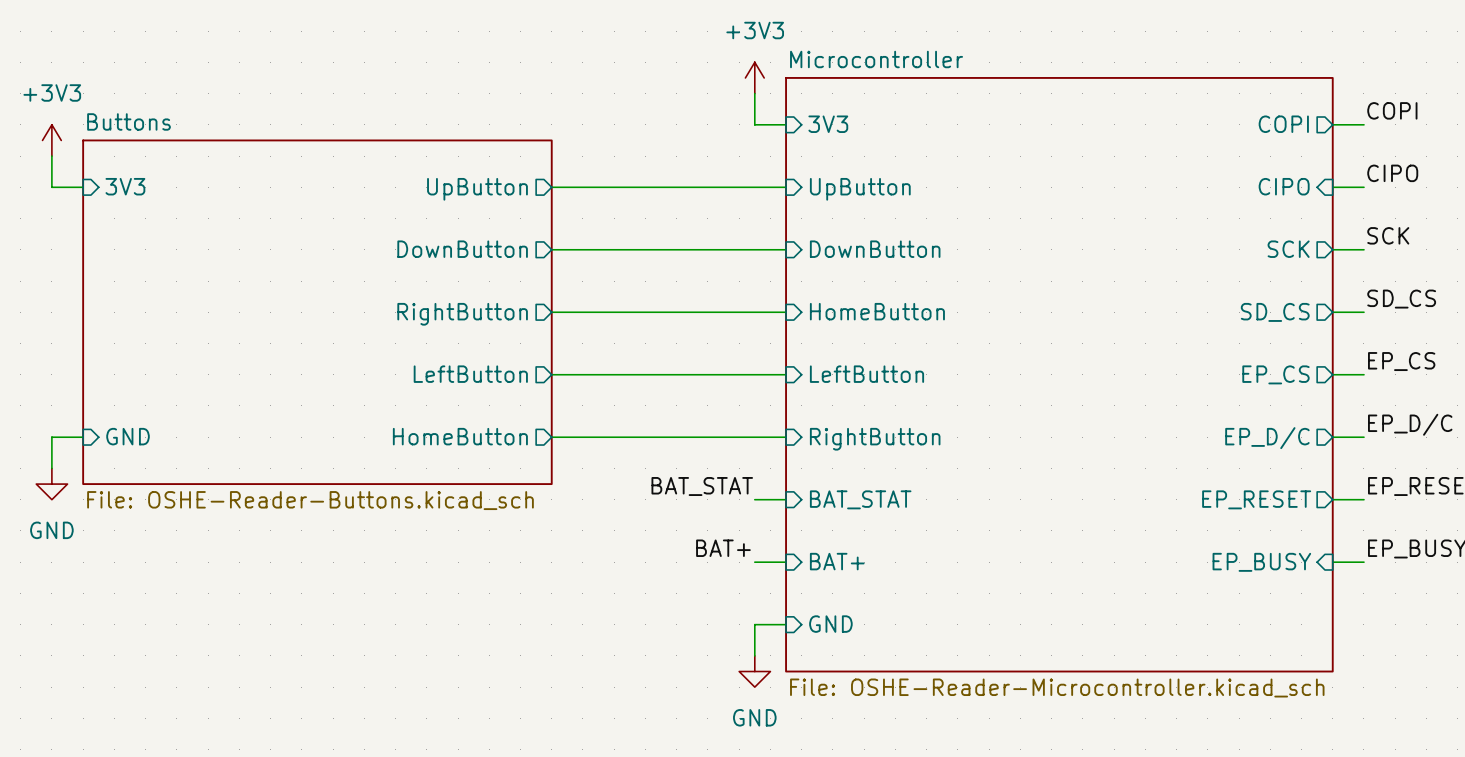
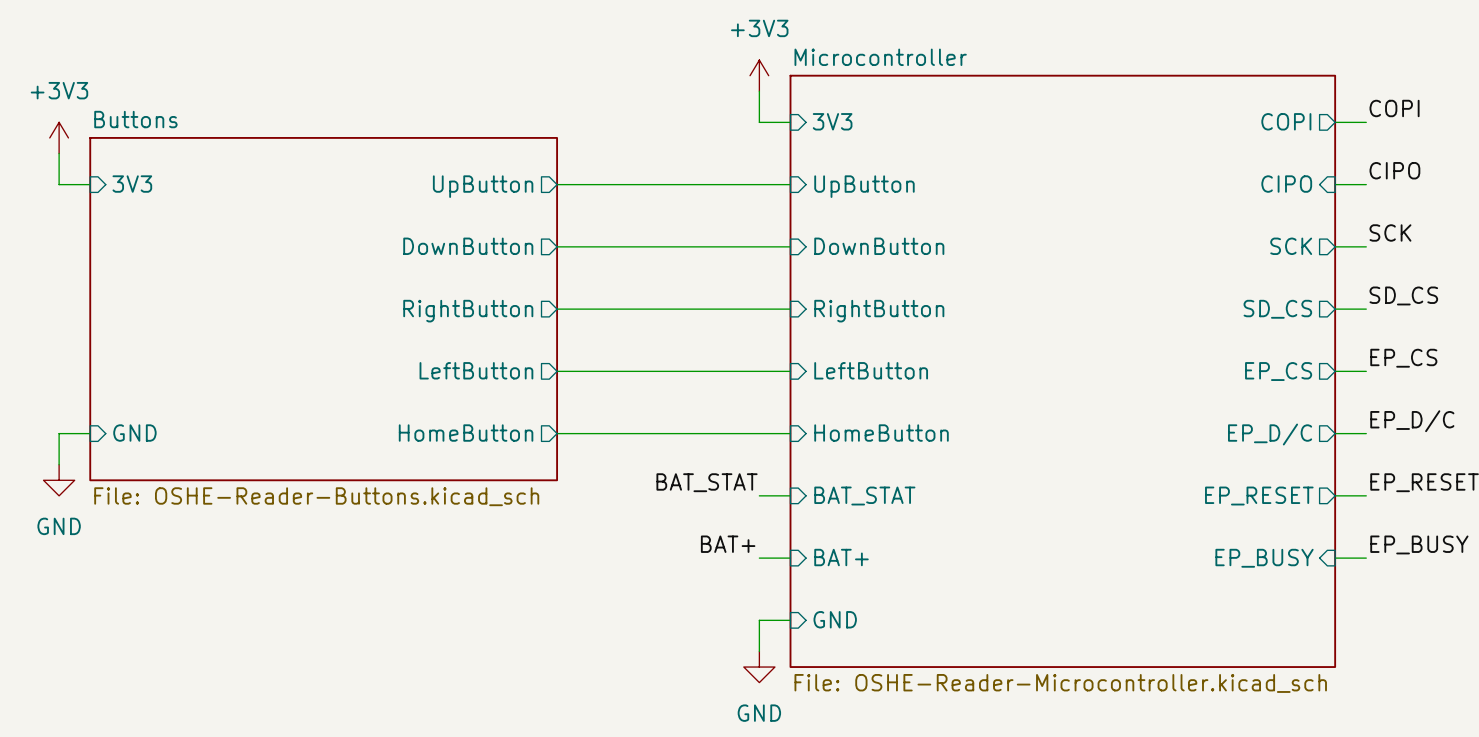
sheet pin: HomeButton (877, 311) -> RightButton (879, 311)
sheet pin: RightButton (875, 439) -> HomeButton (881, 433)

